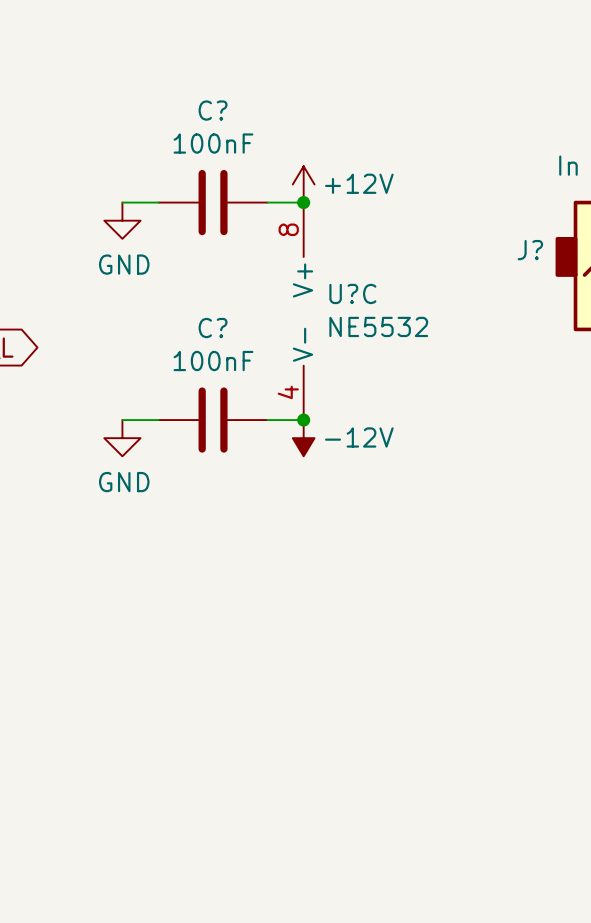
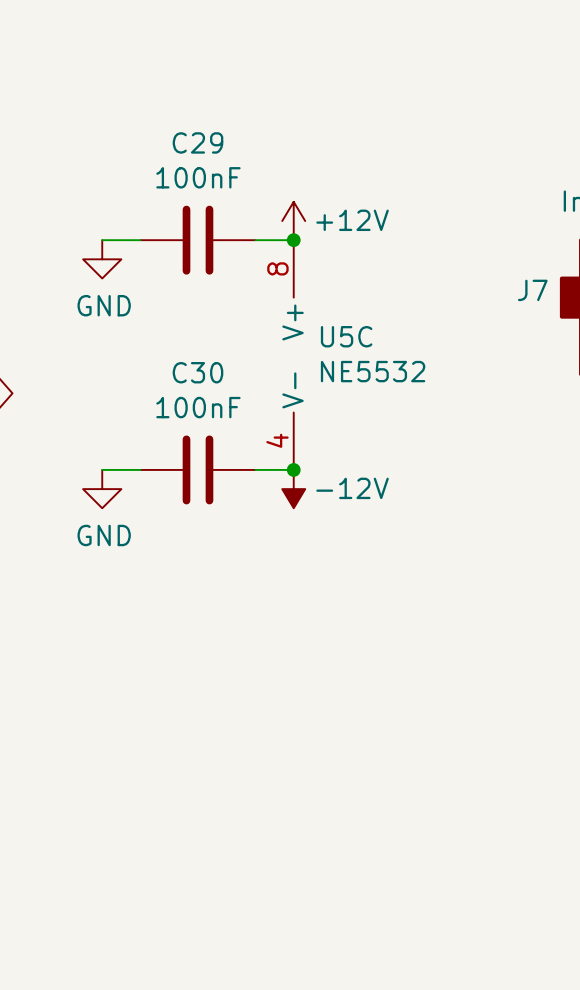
C? name: C? (213, 110) -> C29 (197, 142)
J? name: J? (530, 250) -> J7 (532, 290)
U?C name: U?C (352, 293) -> U5C (346, 336)
C? name: C? (213, 328) -> C30 (197, 372)

